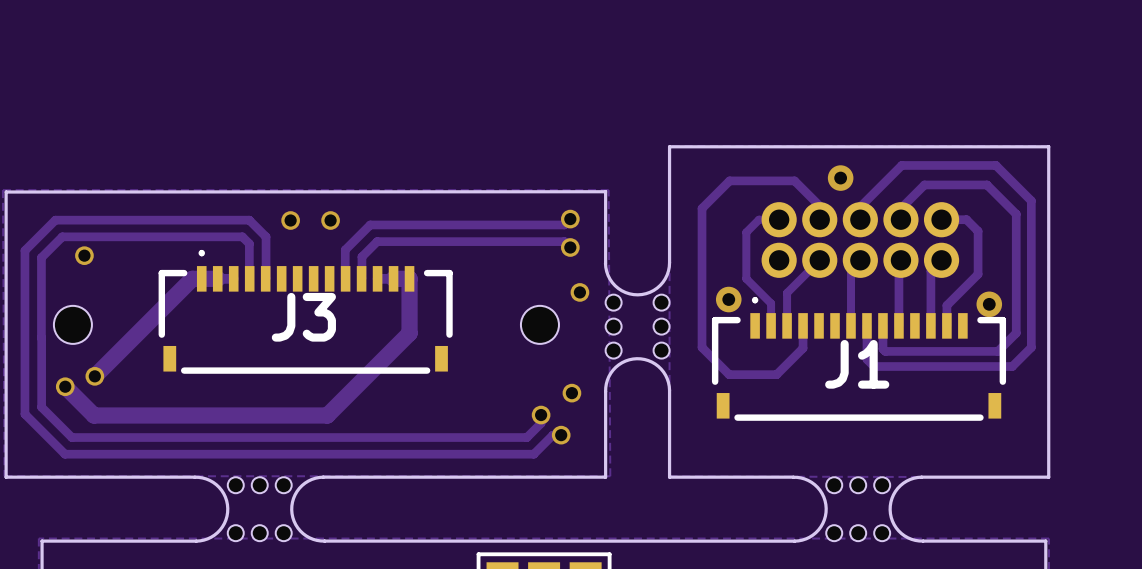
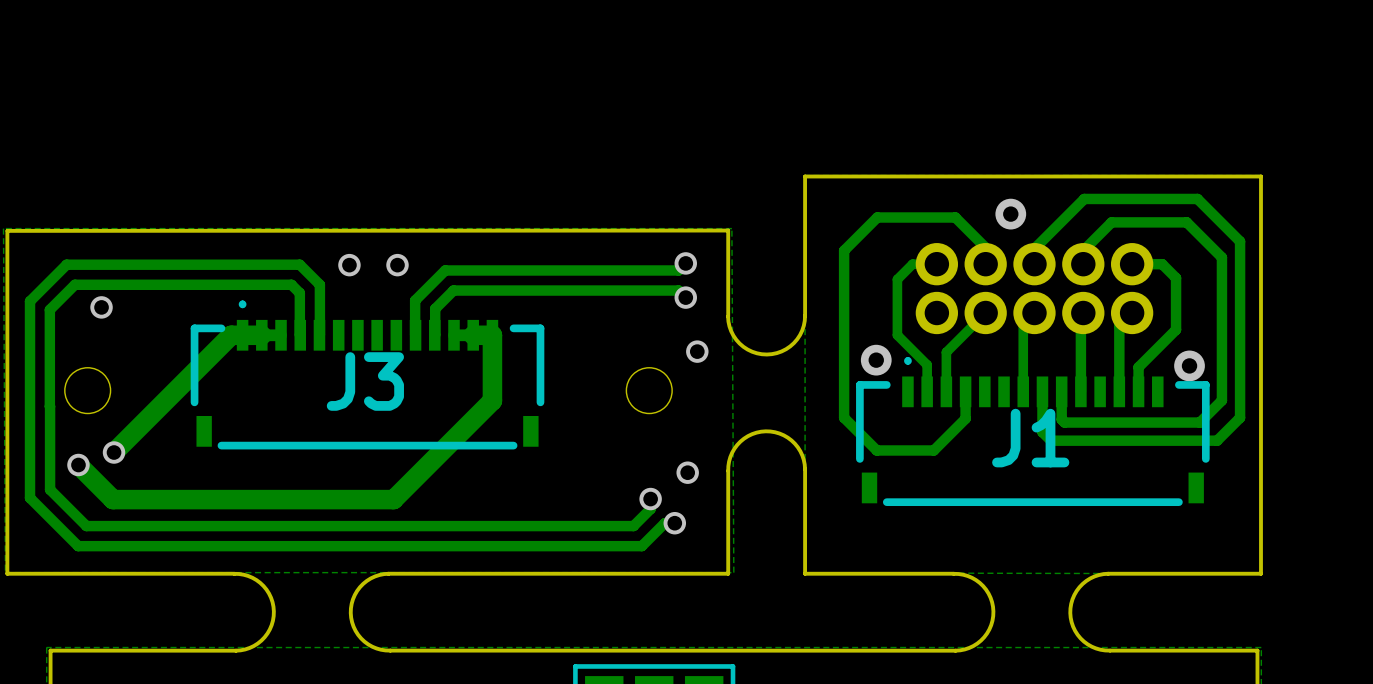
part: (637, 326) -> none
part: (259, 509) -> none
part: (858, 509) -> none

